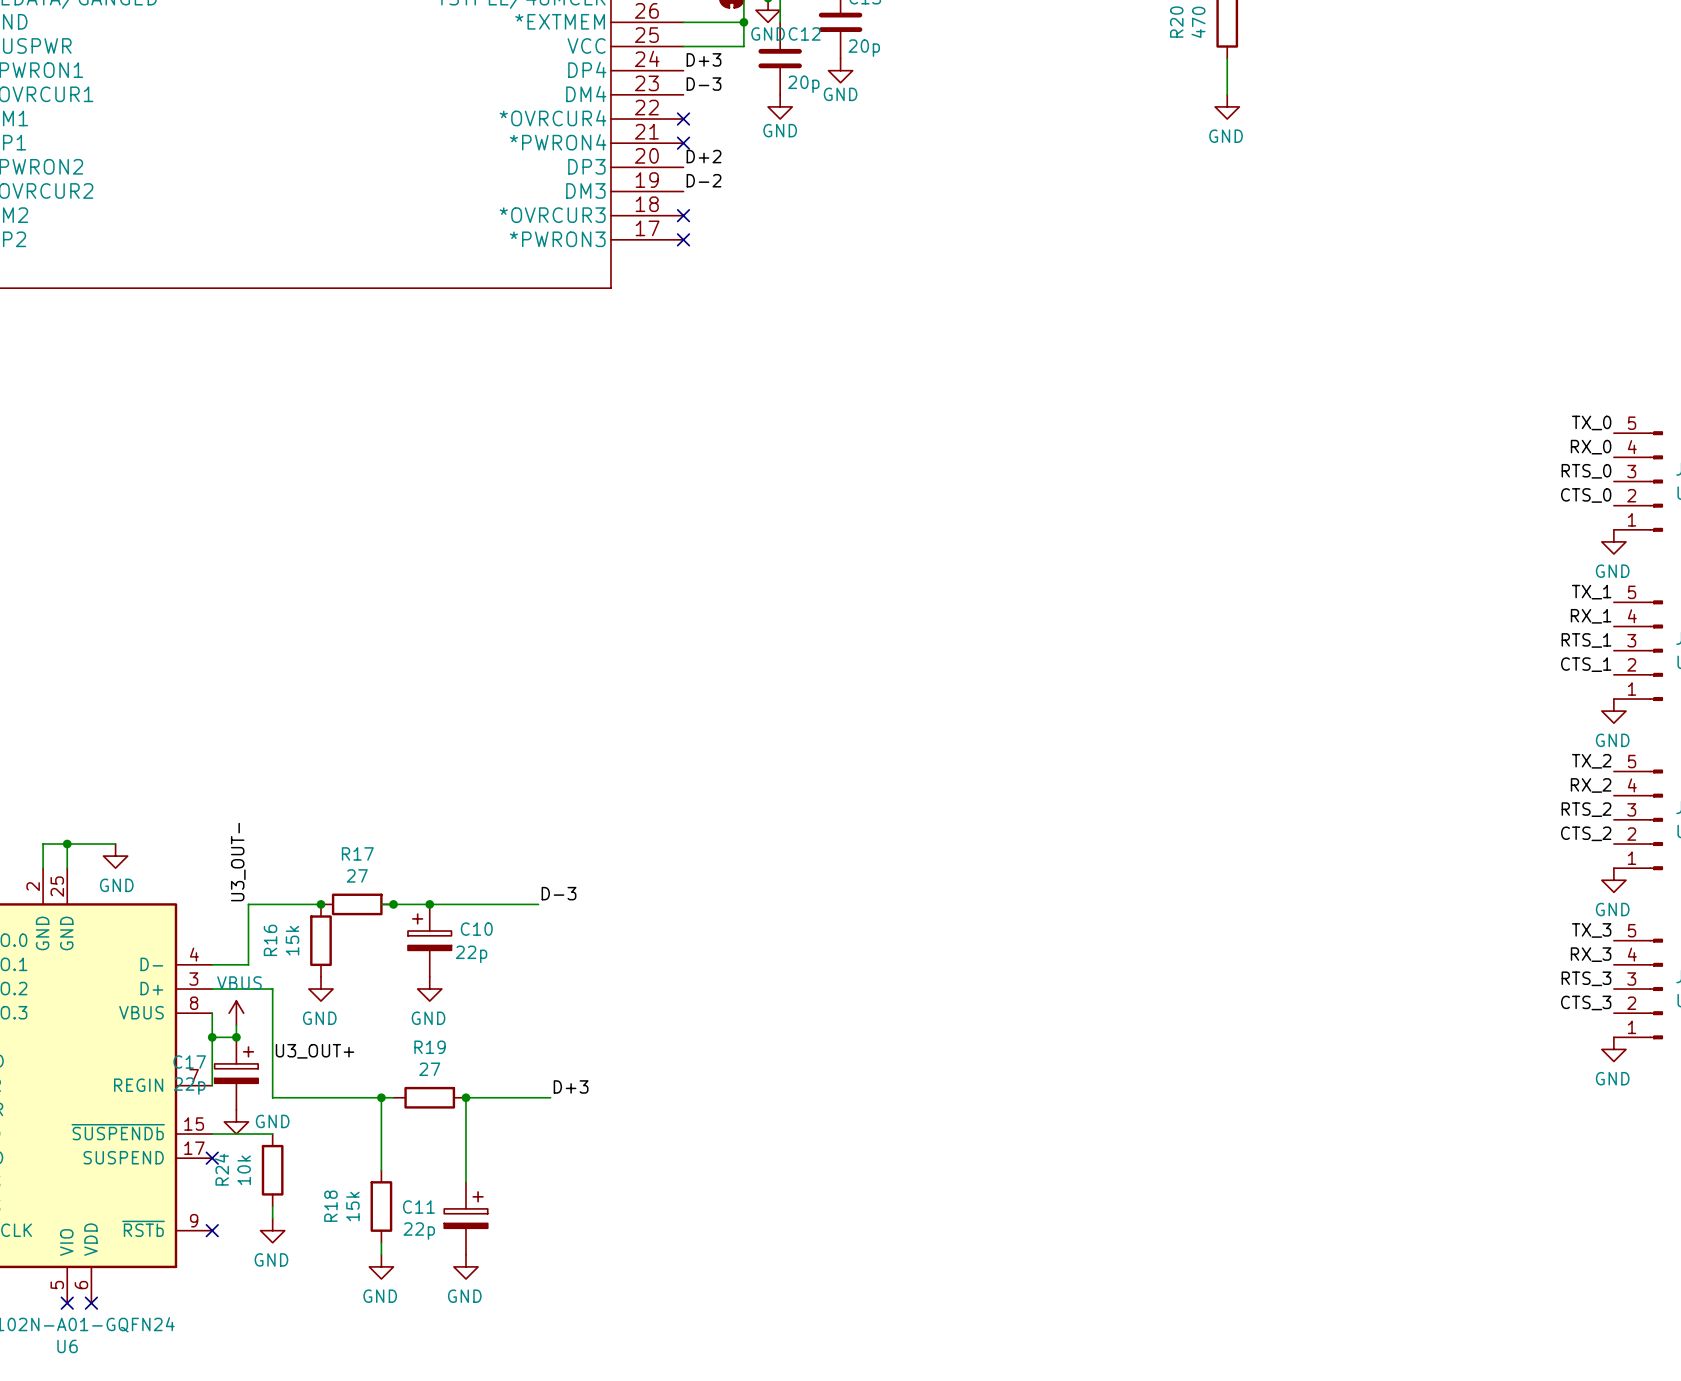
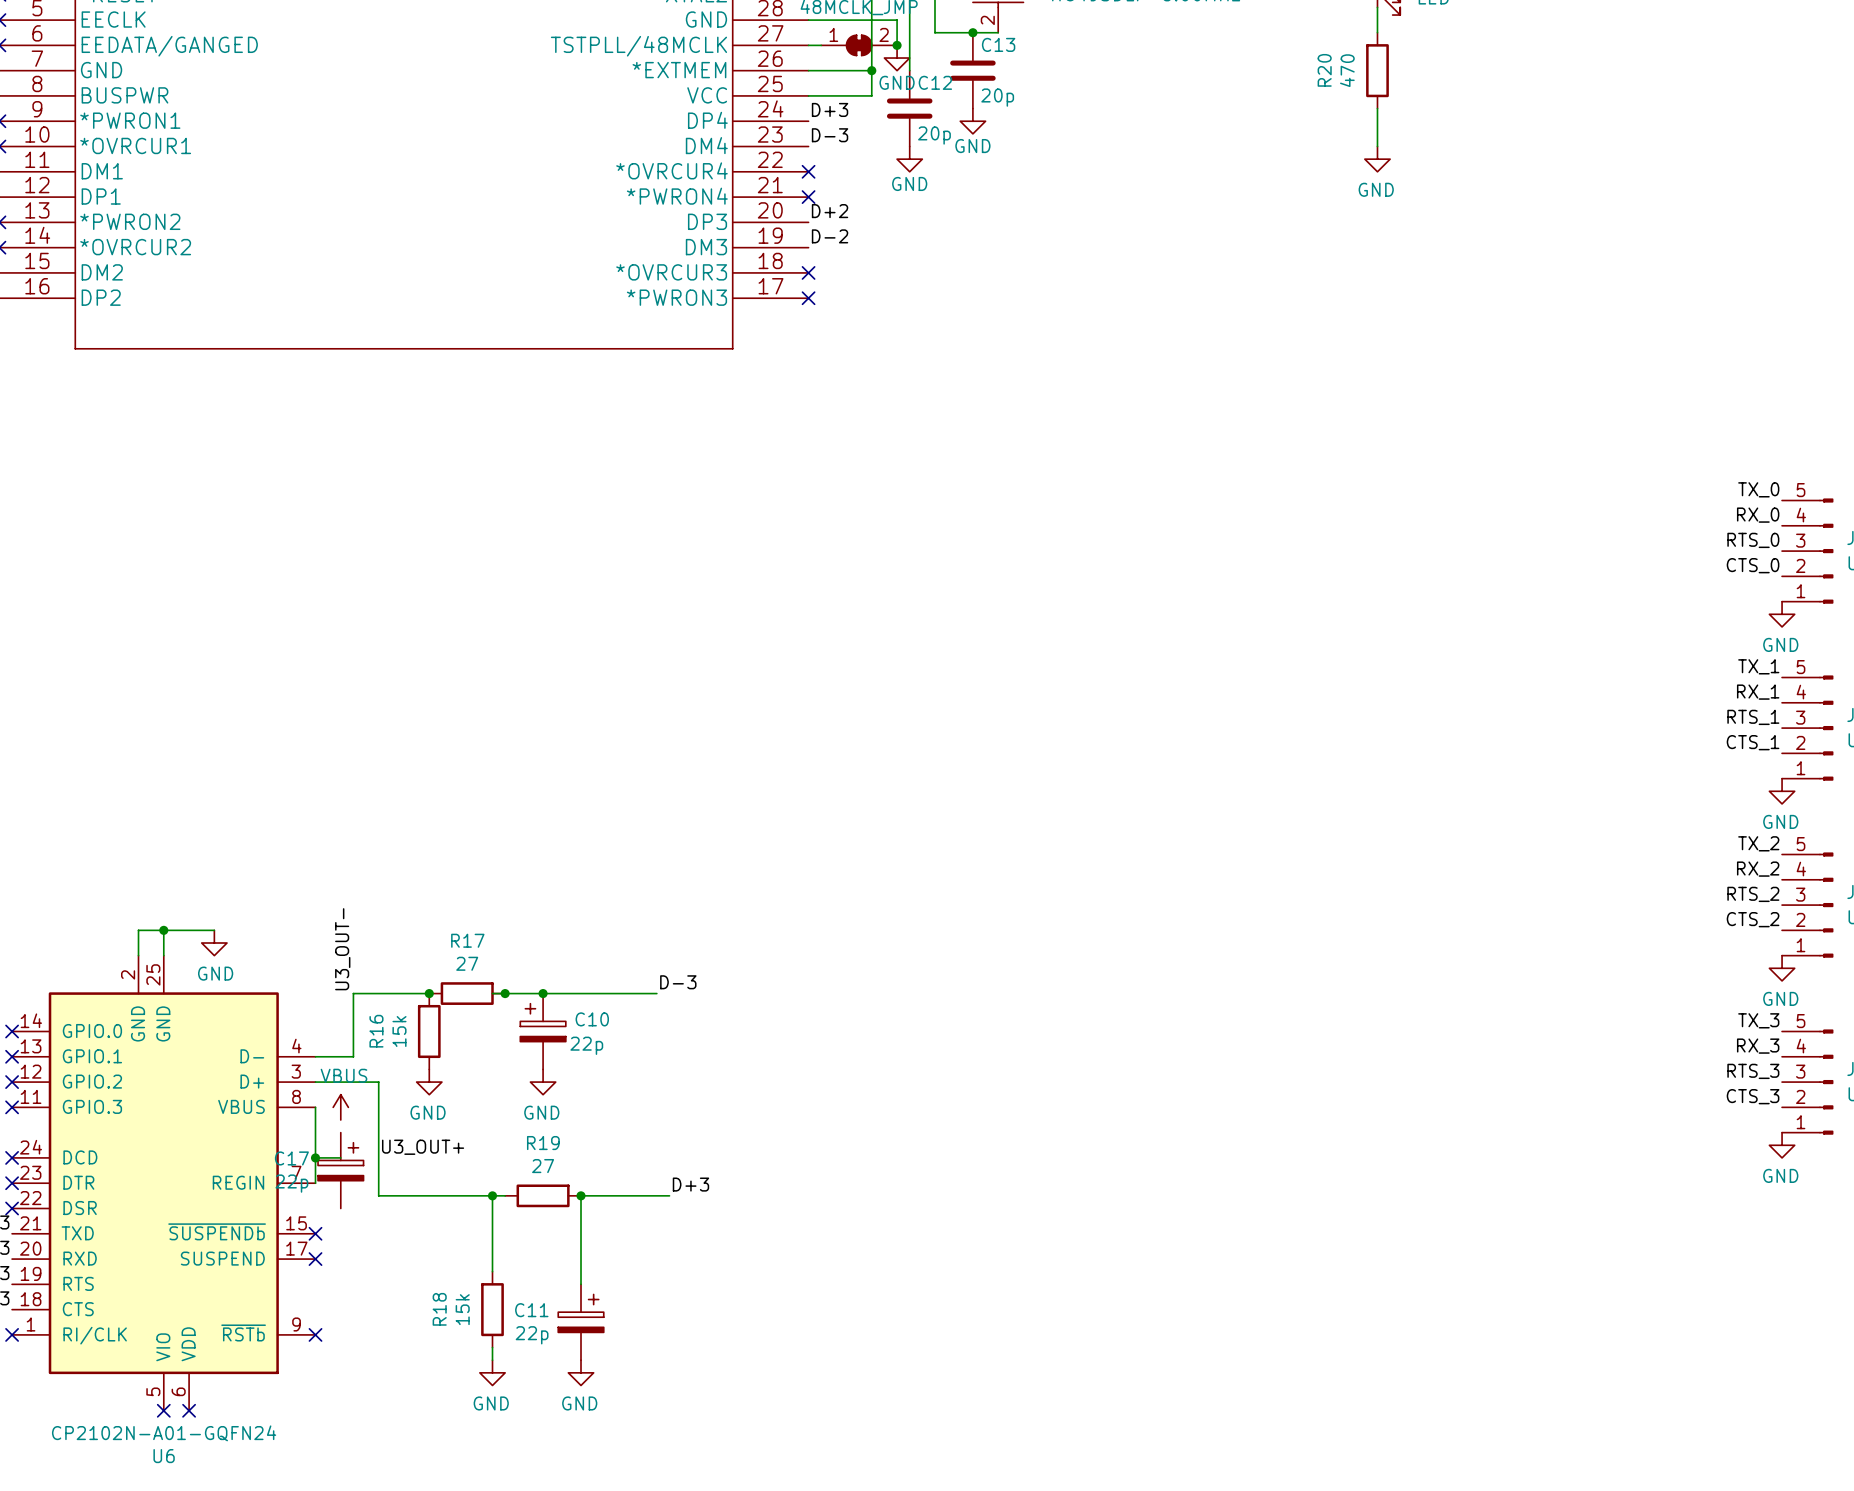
wire: (236, 1025) (236, 1037) (212, 1037) -> none
junction: (212, 1037) -> none
junction: (236, 1037) -> none
wire: none -> (315, 1157) (340, 1157)
junction: none -> (315, 1157)
power symbol: GND (236, 1121) -> none
wire: (212, 1134) (272, 1134) -> none
no-connect mark: none -> (315, 1233)
R24: 10k (272, 1170) -> none
wire: (272, 1206) (272, 1218) -> none
power symbol: GND (272, 1230) -> none

